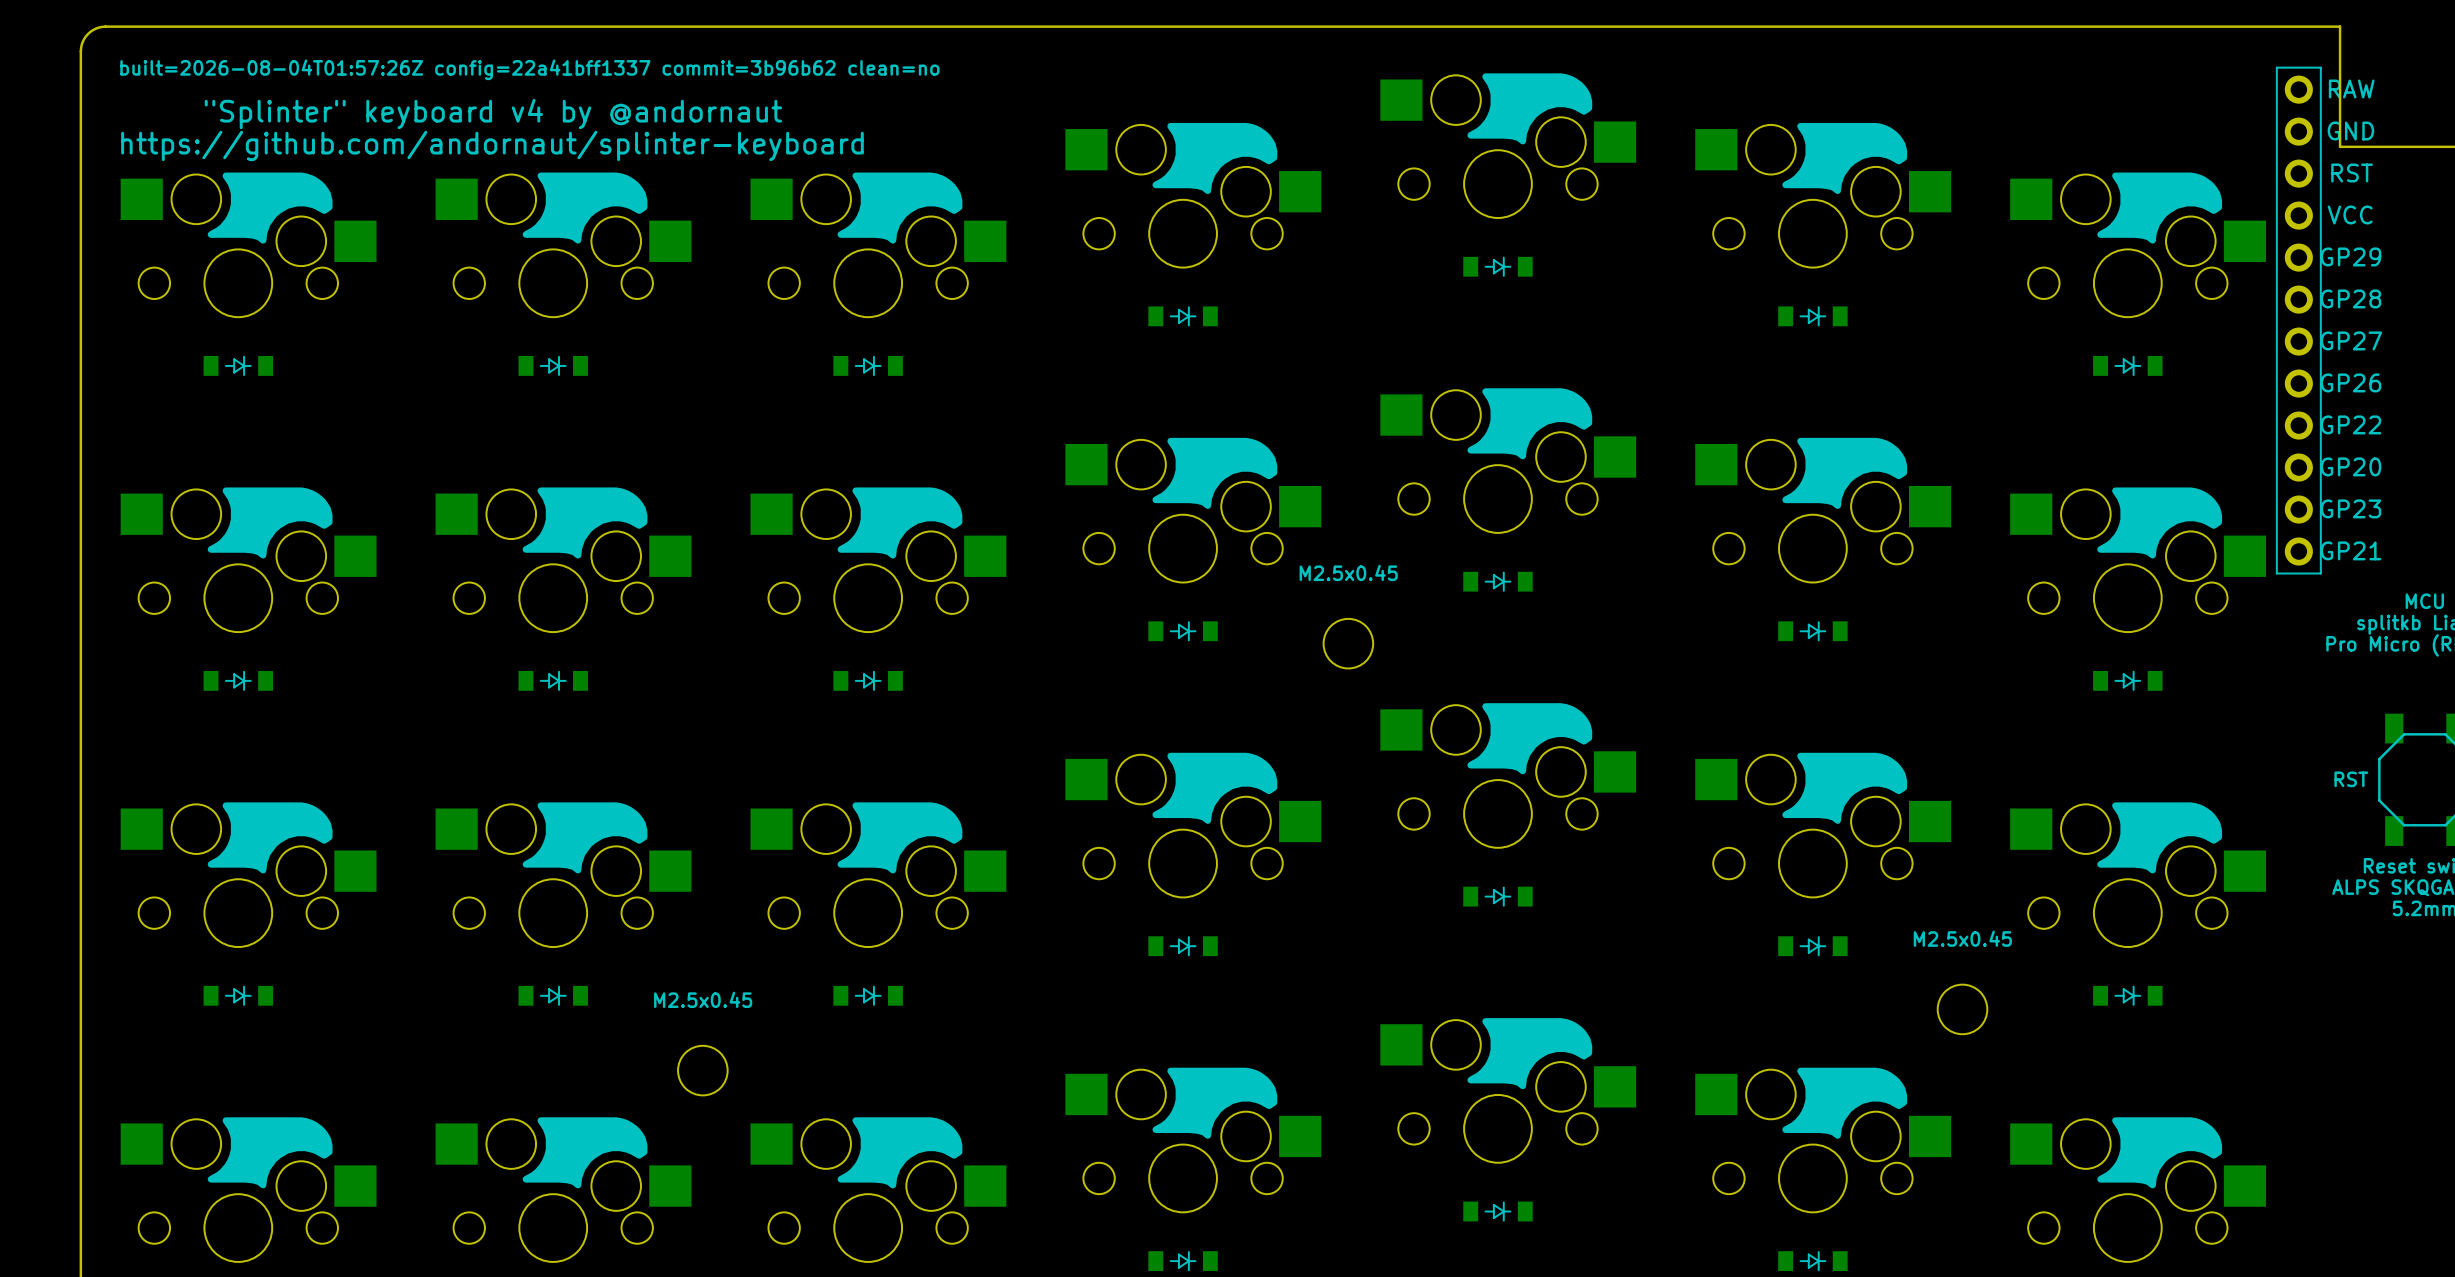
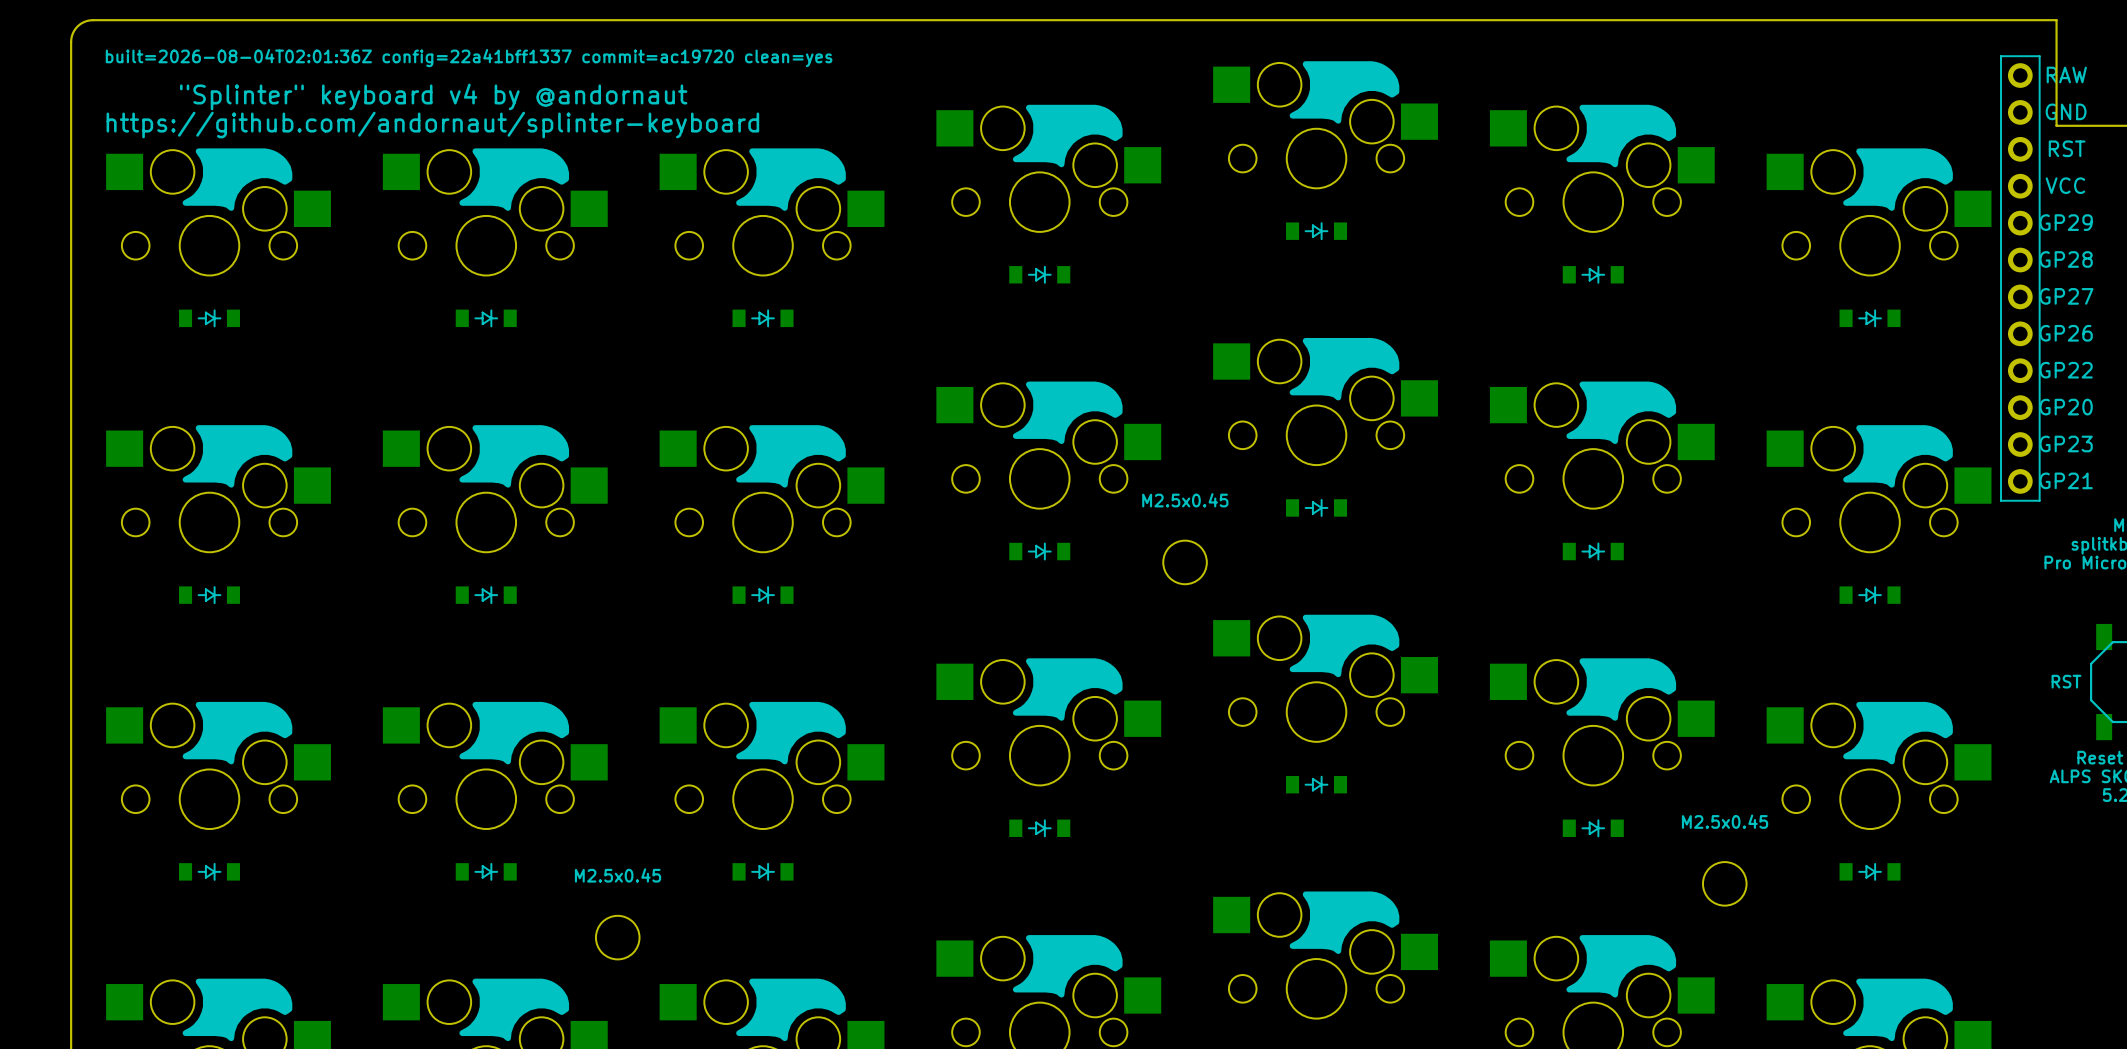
text: built=2026-08-04T01:57:26Z config=22a41bff1337 commit=3b96b62 clean=no (529, 69) -> built=2026-08-04T02:01:36Z config=22a41bff1337 commit=ac19720 clean=yes (469, 58)

